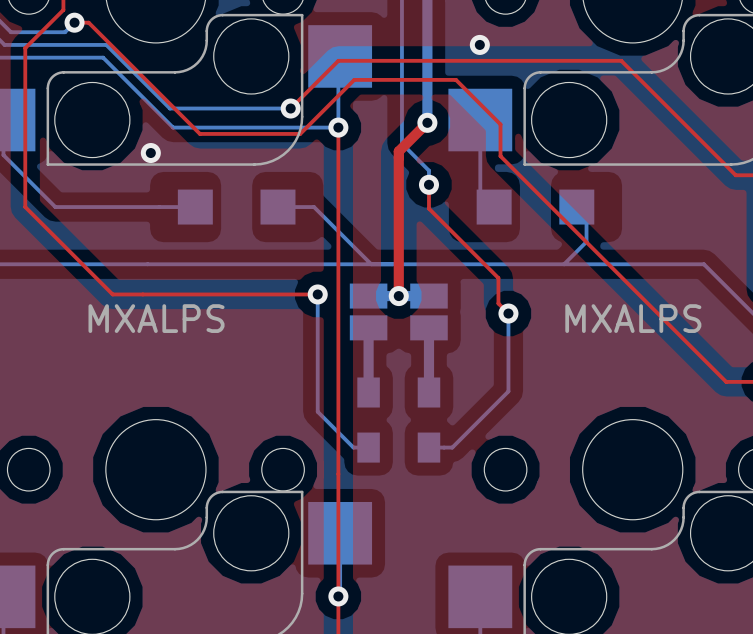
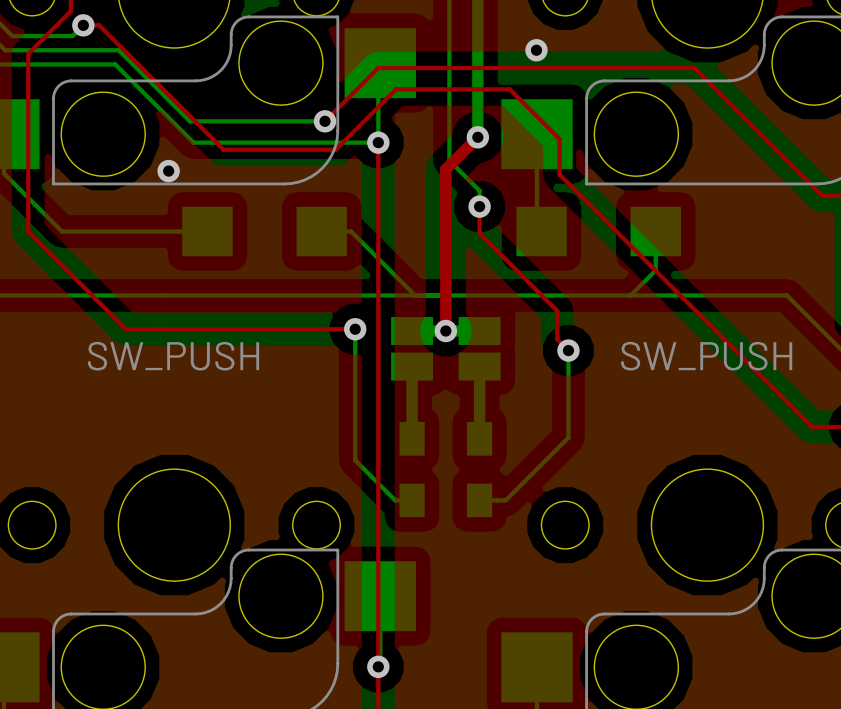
part footprint: [177, 189, 296, 225] -> [182, 206, 347, 257]
part footprint: [476, 189, 595, 225] -> [516, 206, 681, 257]
part value: MXALPS (156, 318) -> SW_PUSH (173, 356)
part value: MXALPS (633, 318) -> SW_PUSH (706, 356)

